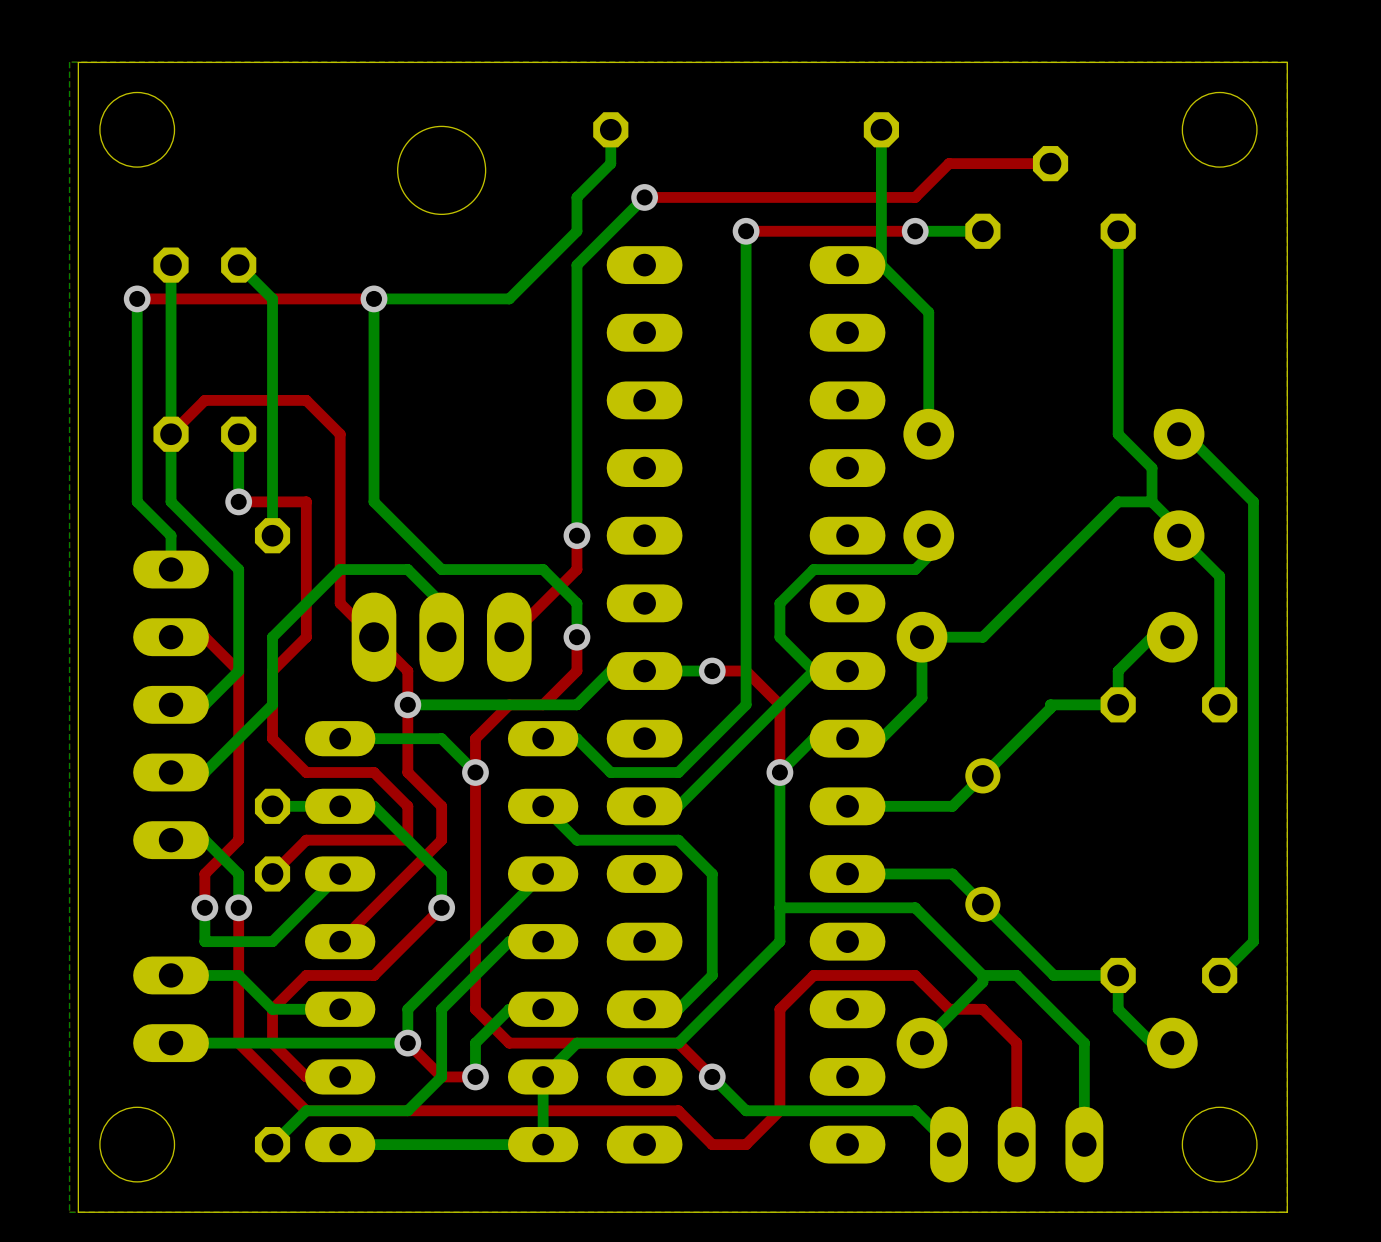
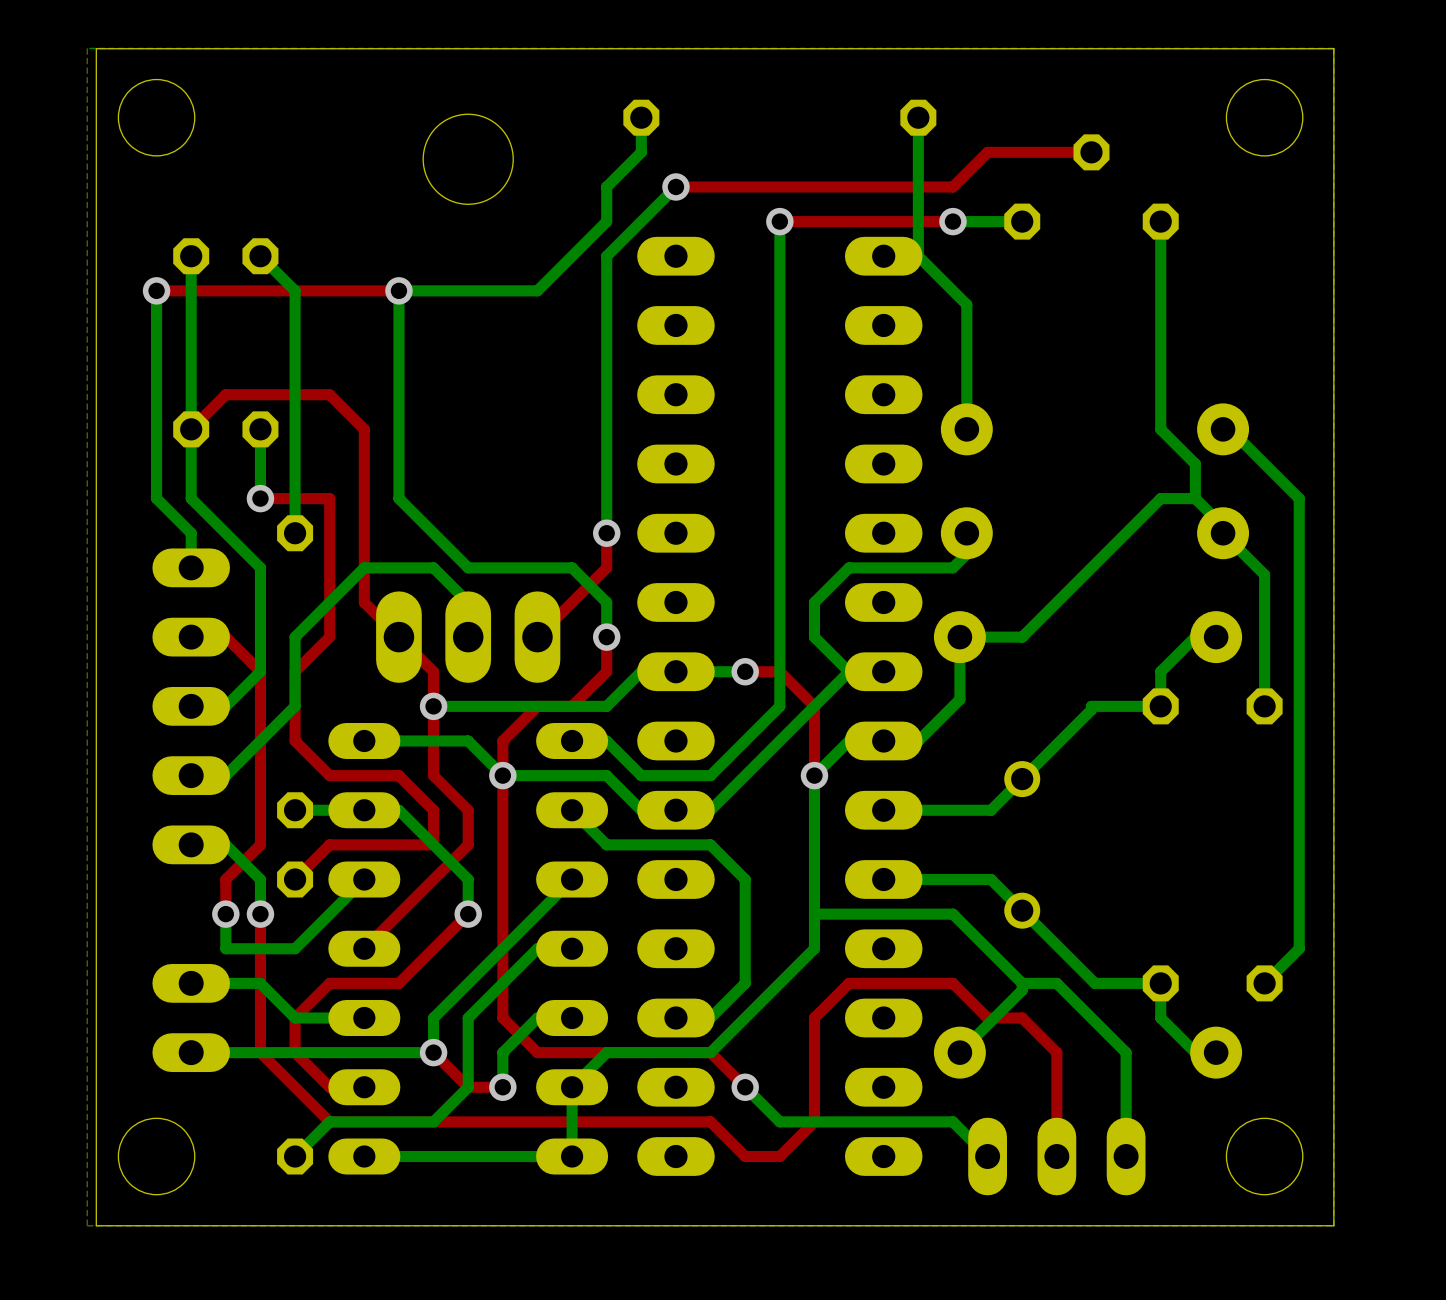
bottom track: none -> (502, 775) (606, 775) (641, 810) (675, 810)

